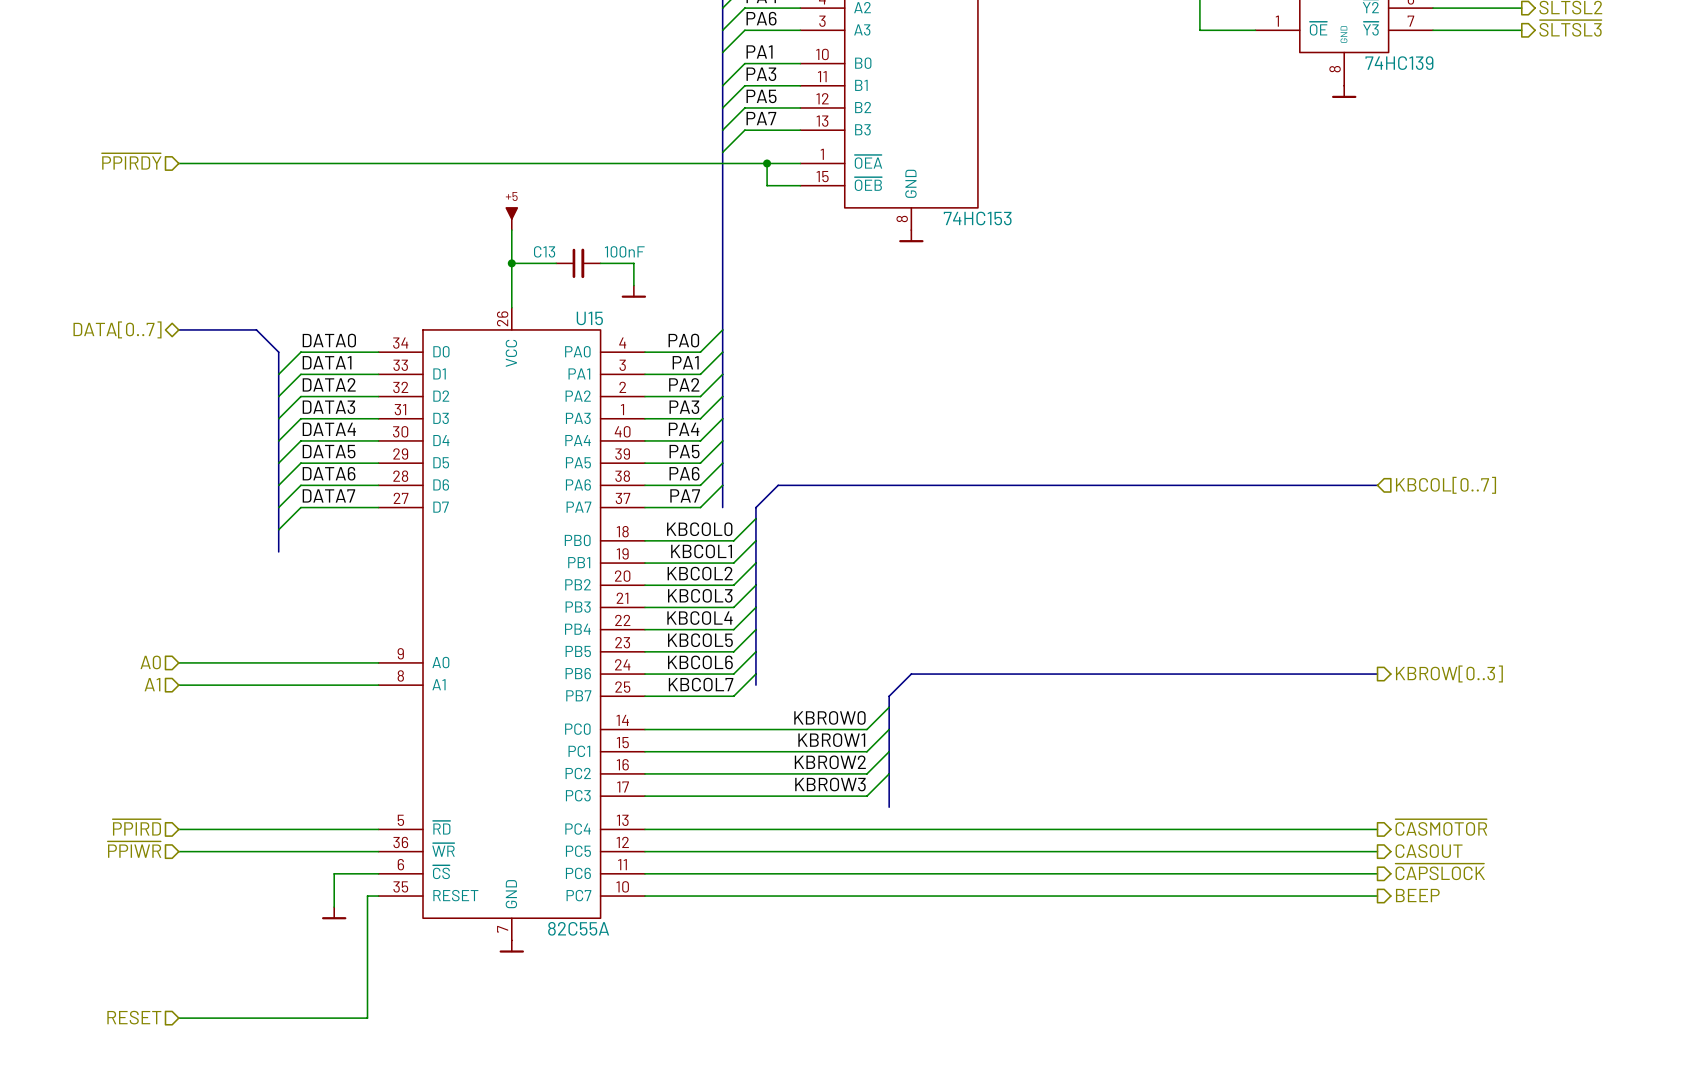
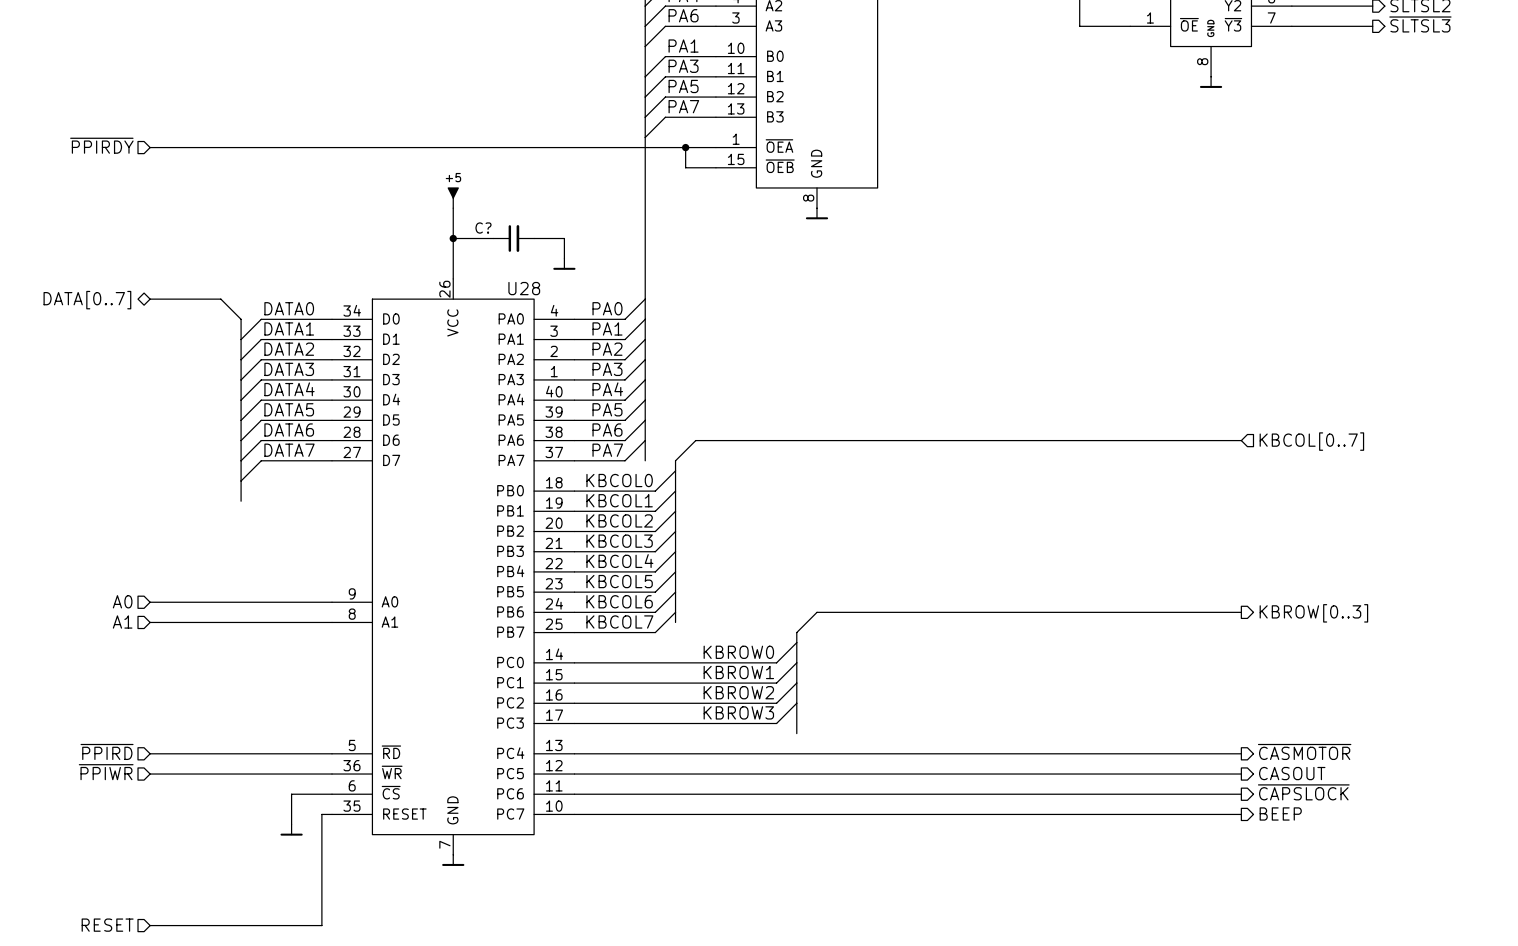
part value: 74HC139 (1399, 63) -> none
part value: 74HC153 (977, 218) -> none
C13 name: C13 (544, 251) -> C? (483, 228)
C13 value: 100nF (624, 251) -> none
U15 name: U15 (589, 318) -> U28 (524, 288)
U15 value: 82C55A (578, 928) -> none

